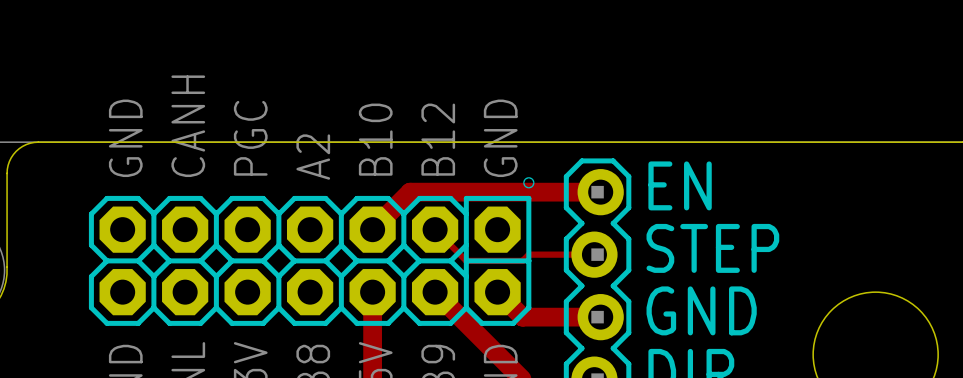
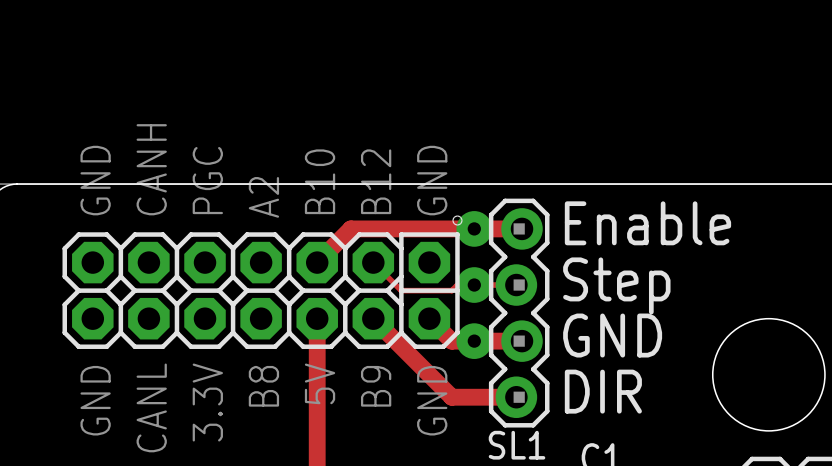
text: EN (680, 185) -> Enable (647, 223)
via: none -> (474, 228)
text: STEP (712, 248) -> Step (616, 285)
via: none -> (474, 285)
via: none -> (474, 341)

